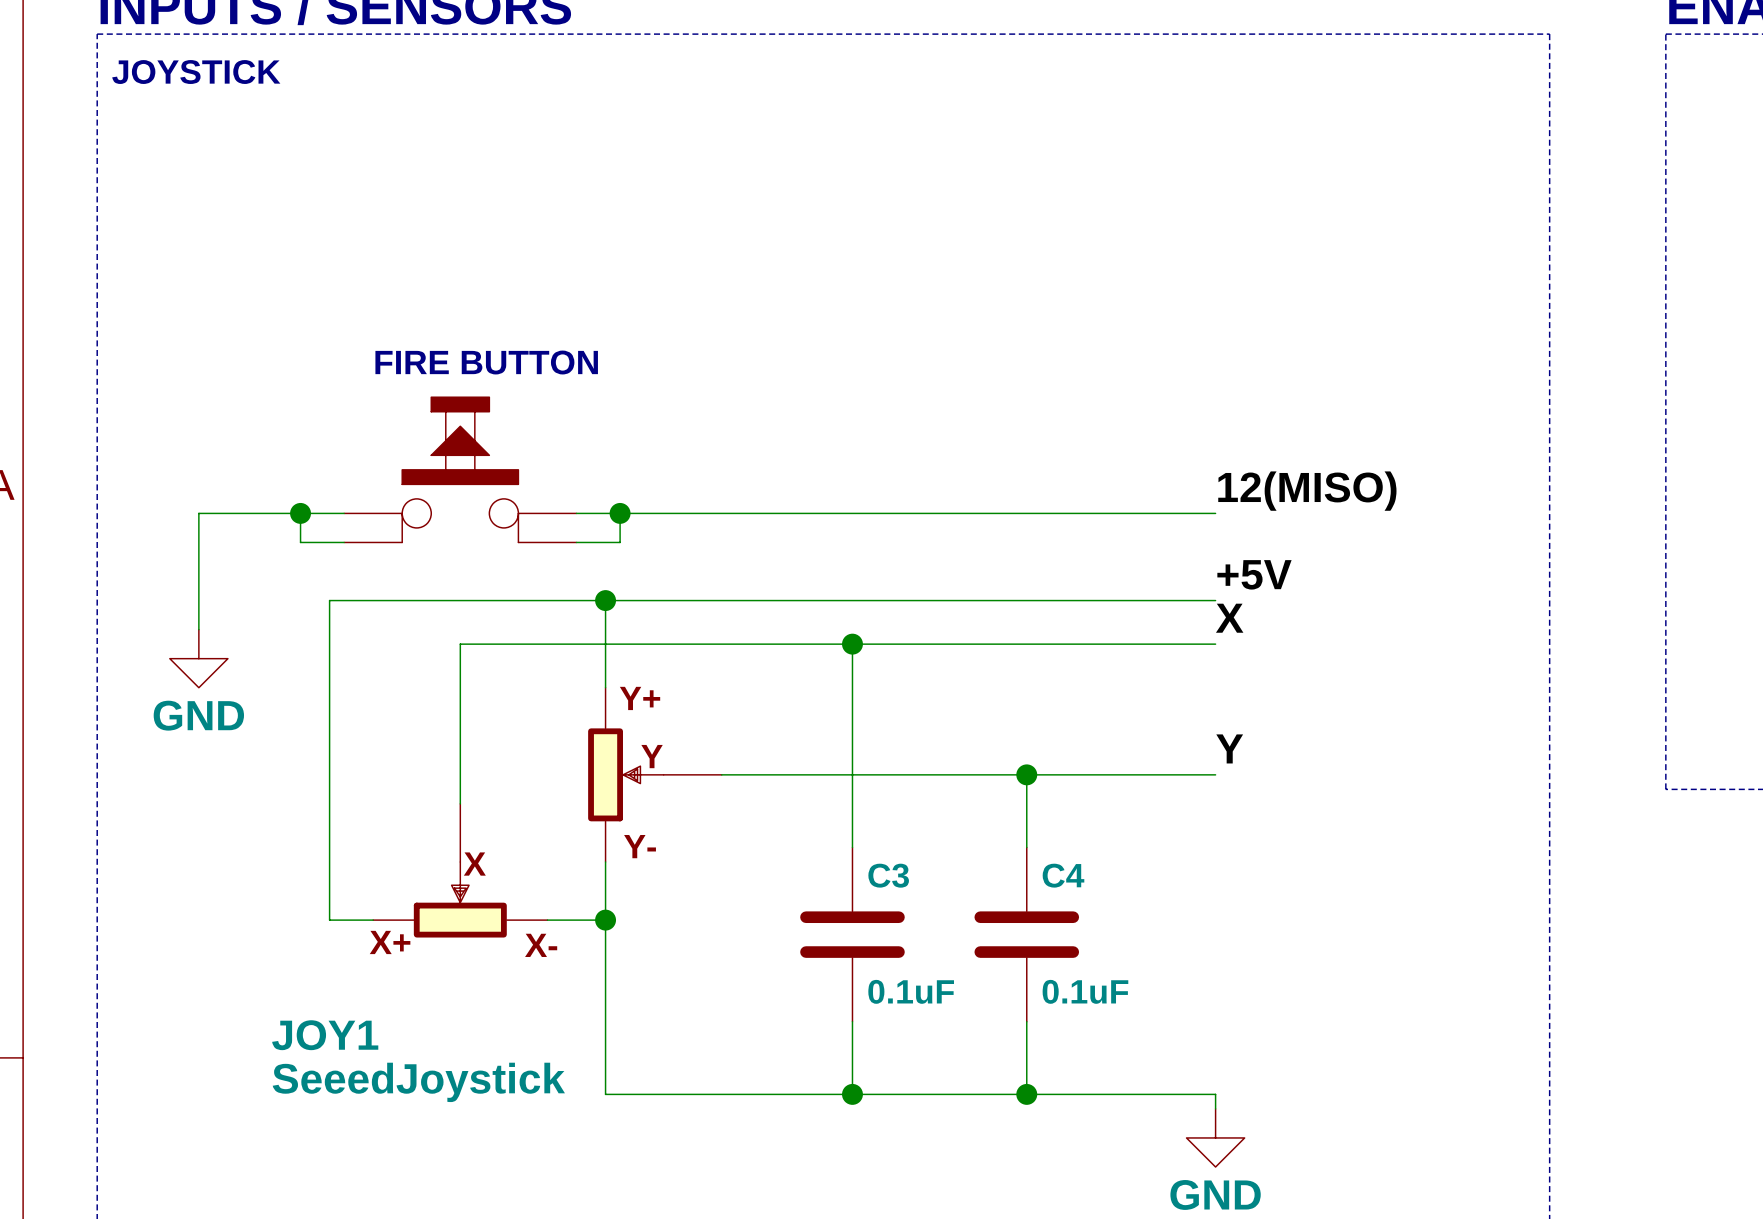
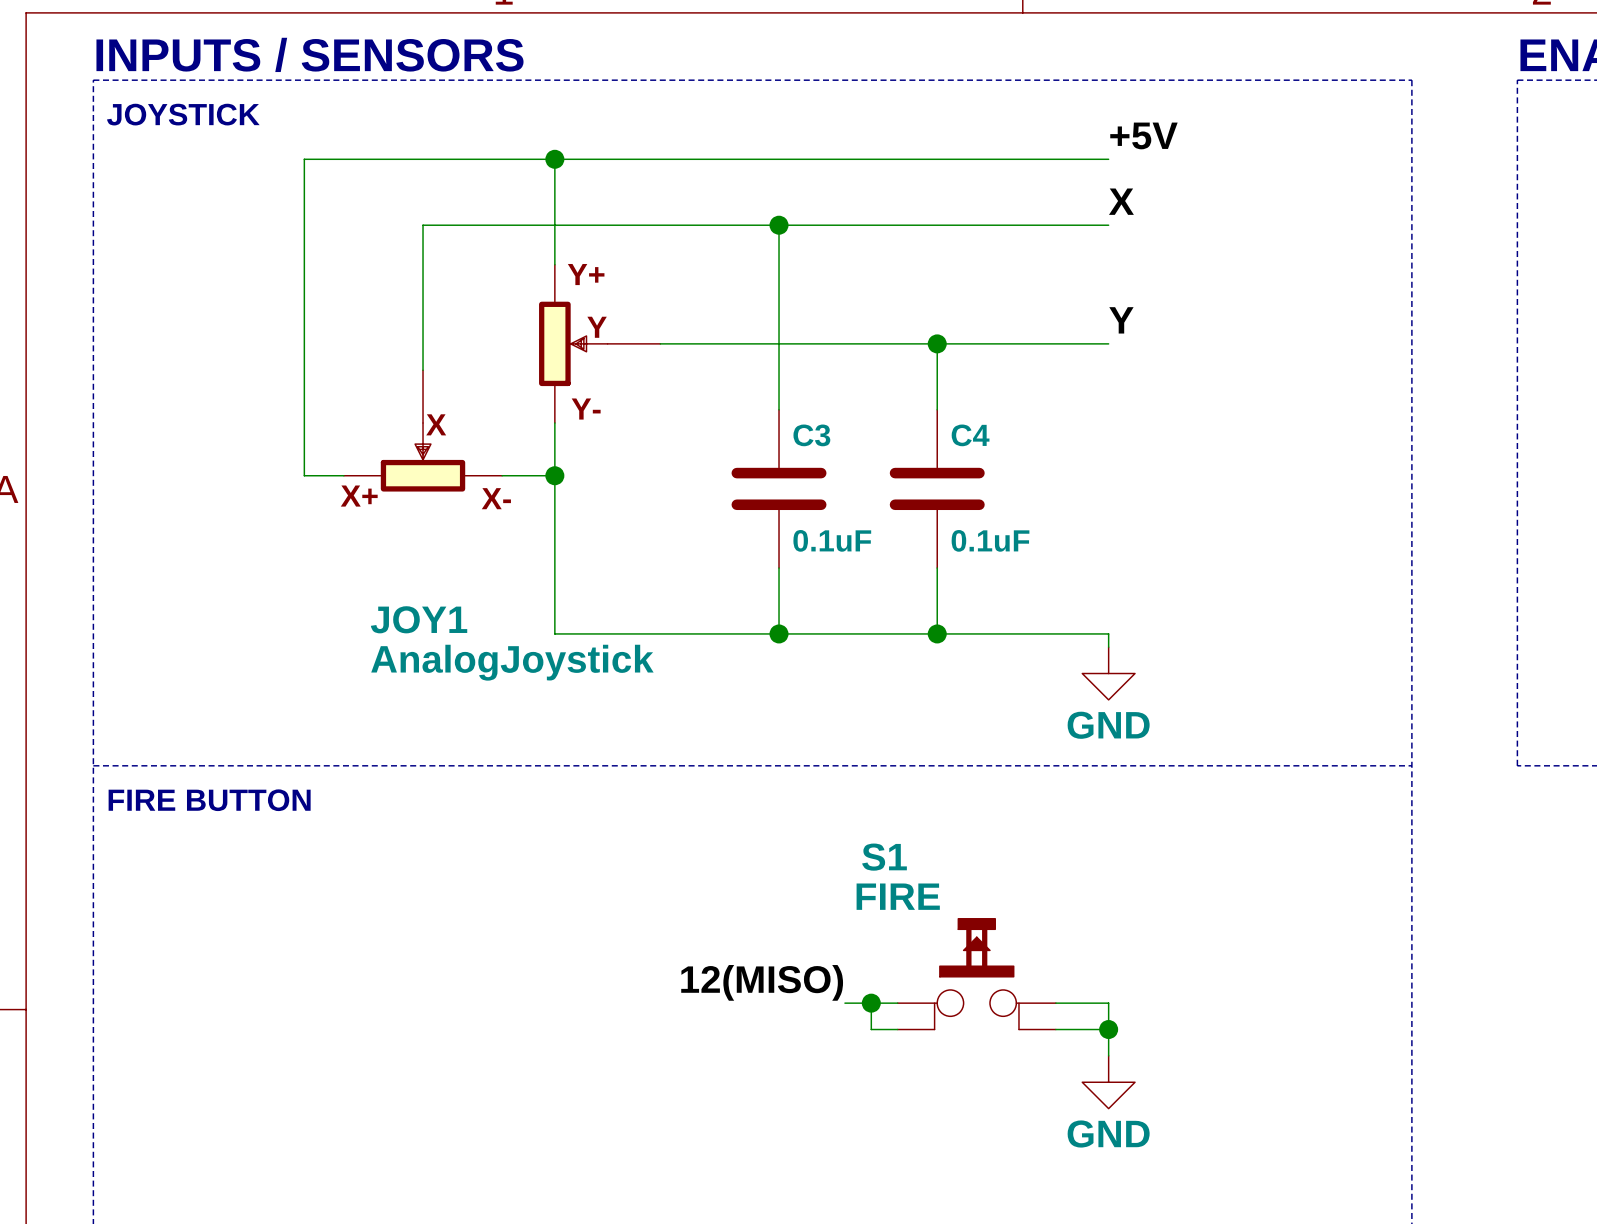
wire: none -> (554, 159) (554, 264)
junction: none -> (554, 159)
wire: none -> (1108, 159) (304, 159) (304, 475) (343, 475)
wire: none -> (779, 225) (779, 409)
junction: none -> (779, 225)
wire: none -> (1108, 225) (423, 225) (423, 370)
junction: none -> (937, 343)
text position: FIRE BUTTON (486, 362) -> FIRE BUTTON (209, 800)
JOY1 symbol: [344, 397, 722, 938] -> [343, 264, 661, 492]
wire: none -> (554, 422) (554, 594)
label: 12(MISO) (1307, 491) -> none
wire: (300, 513) (300, 542) (344, 542) -> none
junction: (300, 513) -> none
wire: (344, 513) (198, 513) (198, 629) -> none
wire: (576, 513) (1215, 513) -> none
wire: (620, 513) (620, 542) (576, 542) -> none
junction position: (620, 513) -> (554, 475)
label position: +5V (1254, 574) -> +5V (1143, 135)
junction: (605, 600) -> none
wire: (1215, 600) (329, 600) (329, 920) (373, 920) -> none
label position: X (1229, 618) -> X (1121, 201)
wire: (852, 644) (852, 847) -> (779, 633) (779, 568)
wire: none -> (1108, 633) (1108, 647)
power symbol: GND (198, 658) -> none
wire: (605, 687) (605, 644) (460, 644) (460, 803) -> none
power symbol: none -> GND (1108, 673)
label position: Y (1229, 748) -> Y (1121, 320)
wire: (721, 774) (1215, 774) -> (660, 343) (1108, 343)
wire: (1026, 774) (1026, 847) -> (937, 343) (937, 409)
junction position: (1026, 774) -> (937, 633)
line: none -> (93, 765) (1411, 765)
wire: (605, 862) (605, 1094) (1215, 1094) -> (1055, 1003) (1108, 1003) (1108, 1042)
wire: (547, 920) (605, 920) -> (502, 475) (554, 475)
junction: (605, 920) -> none
C3 position: (852, 934) -> (779, 488)
C4 position: (1026, 934) -> (937, 488)
S1: none -> FIRE (976, 974)
wire: (852, 1021) (852, 1094) -> none
wire: (1026, 1021) (1026, 1094) -> (937, 568) (937, 633)
label: none -> 12(MISO) (762, 982)
JOY1 name position: JOY1 (325, 1035) -> JOY1 (419, 619)
wire: none -> (844, 1003) (897, 1003)
wire: none -> (871, 1003) (871, 1029) (897, 1029)
junction: none -> (871, 1003)
wire: none -> (1055, 1029) (1108, 1029)
junction: none -> (1108, 1029)
JOY1 value: SeeedJoystick (418, 1082) -> AnalogJoystick (512, 662)
junction: (852, 1094) -> none
junction: (1026, 1094) -> none

